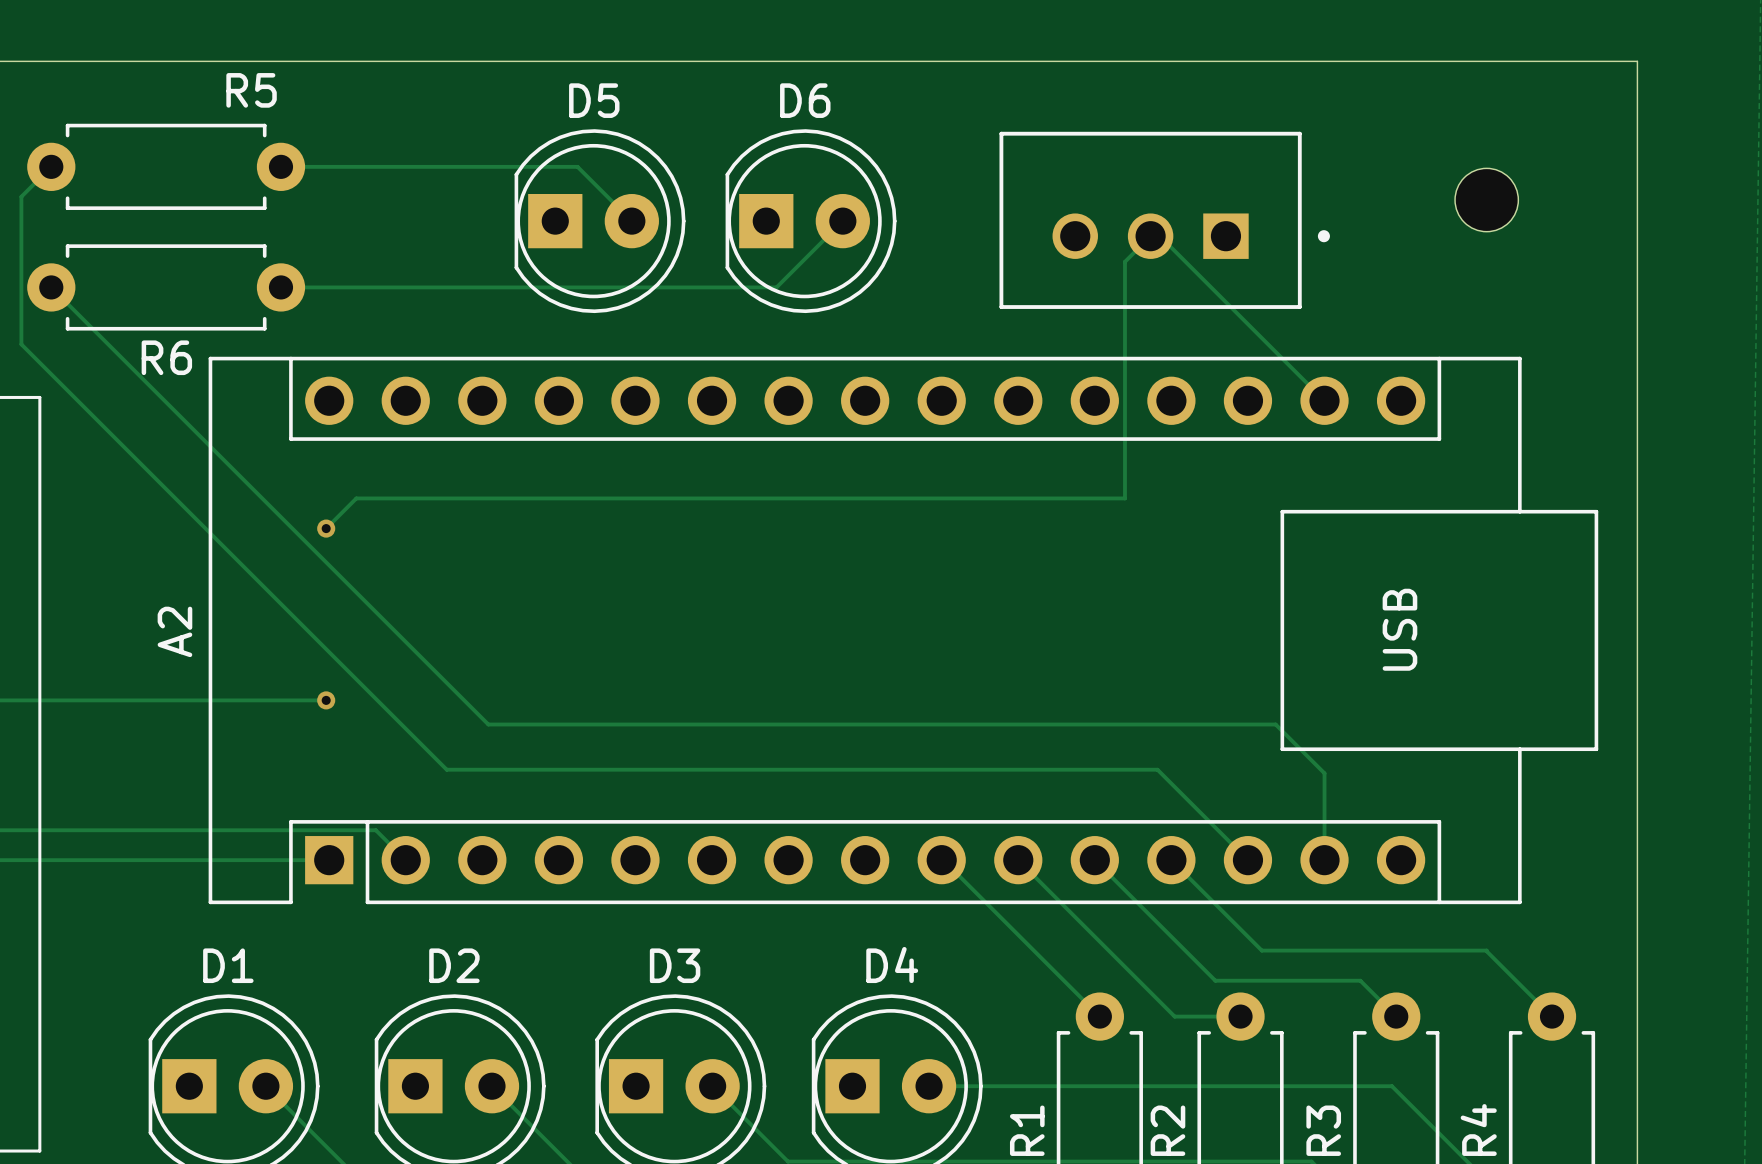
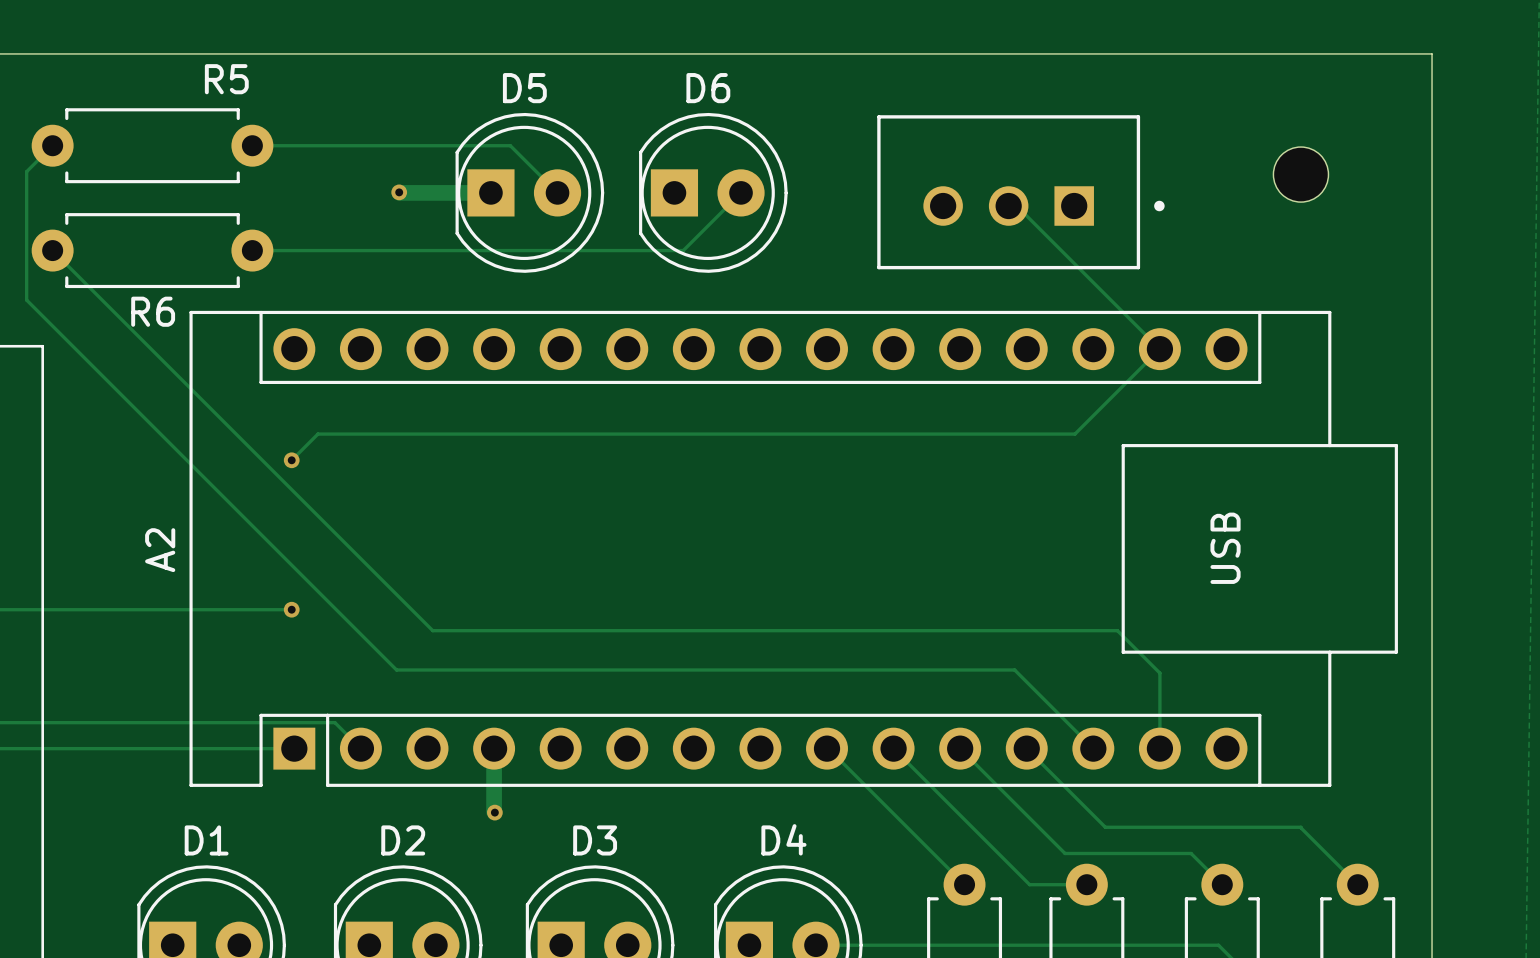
track: none -> (399, 192) (490, 192)
via: none -> (399, 192)
track: (1150, 236) (1124, 261) (1124, 498) -> (1159, 349) (1074, 434) (986, 434)
track: none -> (494, 748) (494, 812)
via: none -> (494, 812)

